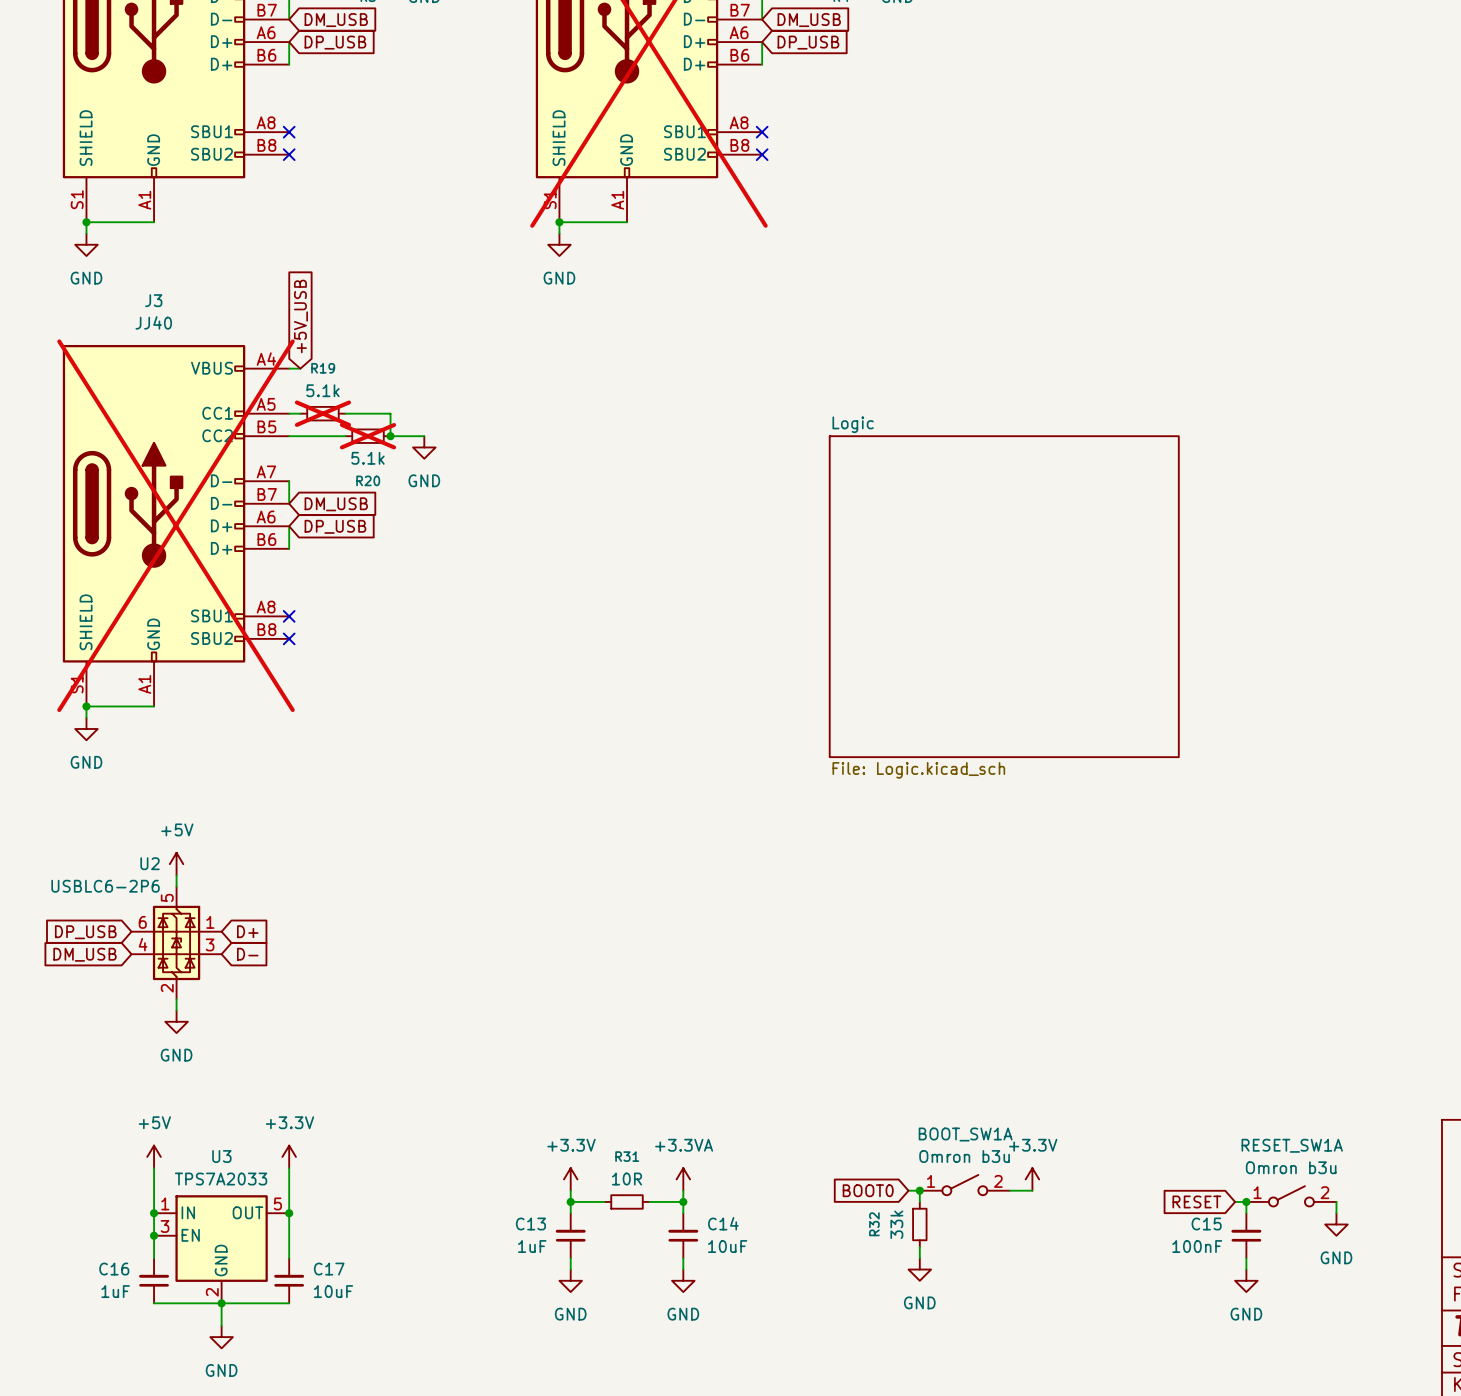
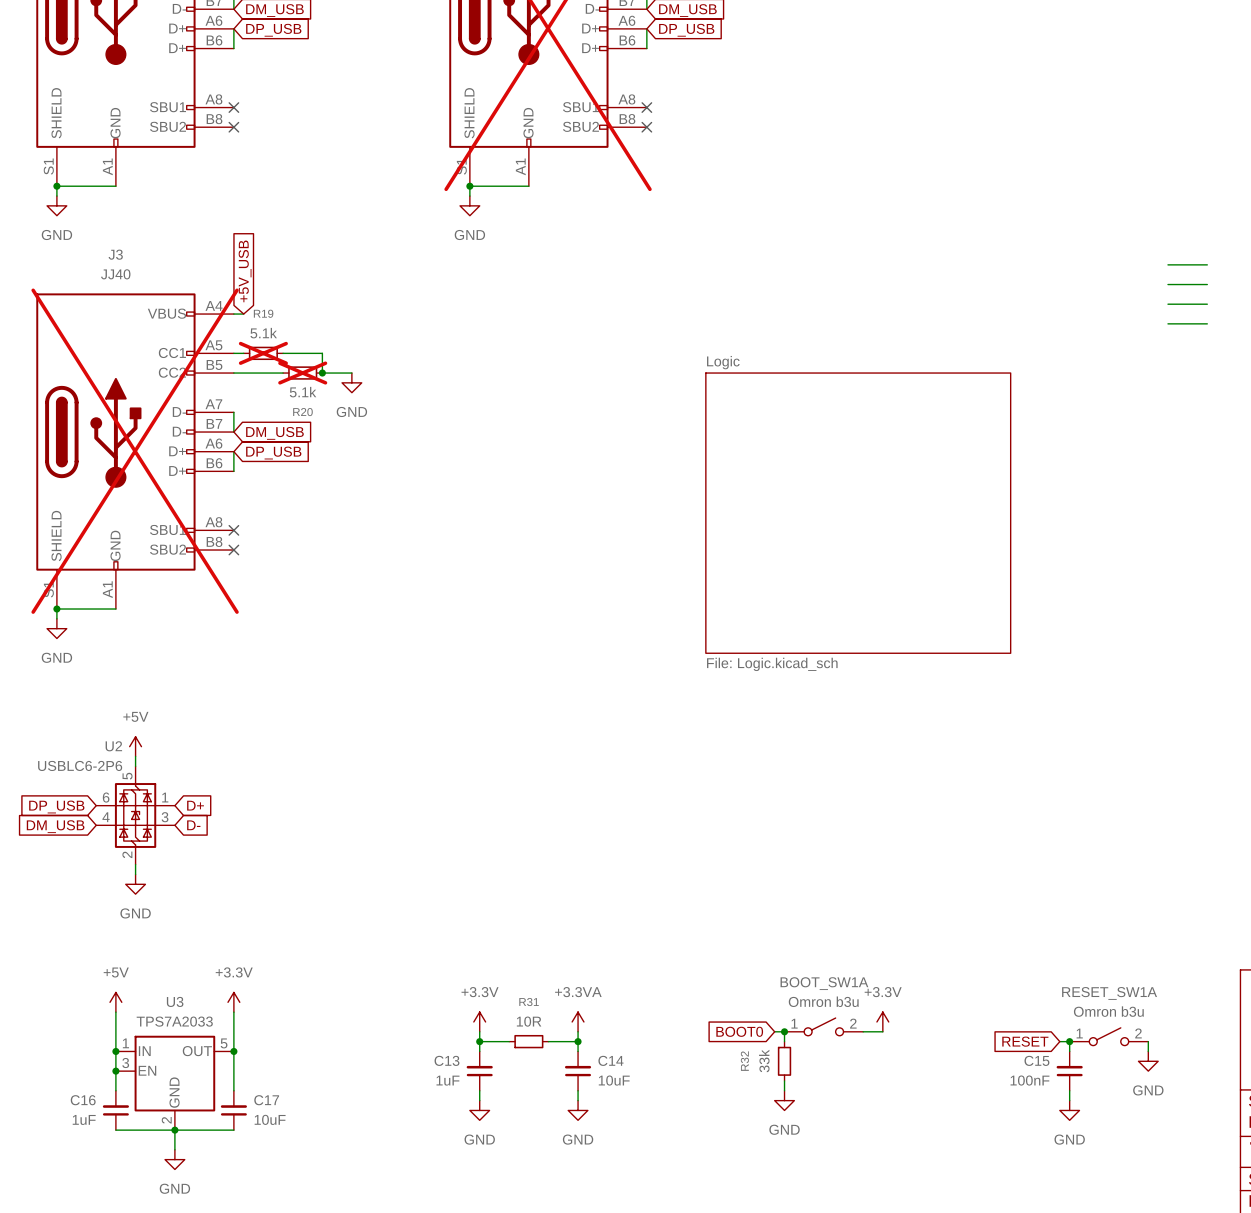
wire: none -> (1167, 264) (1207, 264)
wire: none -> (1167, 284) (1207, 284)
wire: none -> (1167, 304) (1207, 304)
wire: none -> (1167, 323) (1207, 323)

